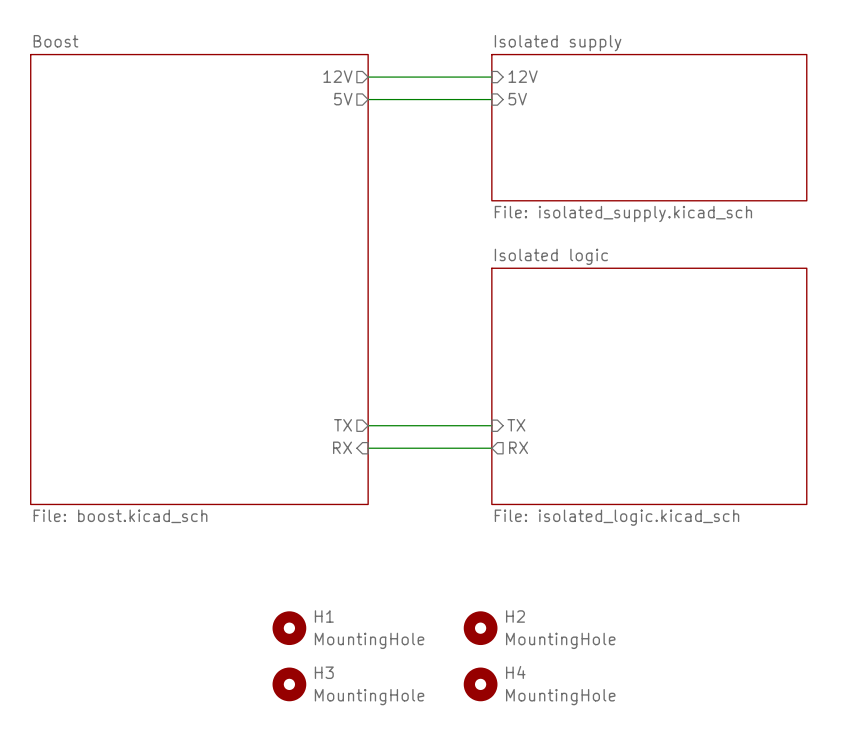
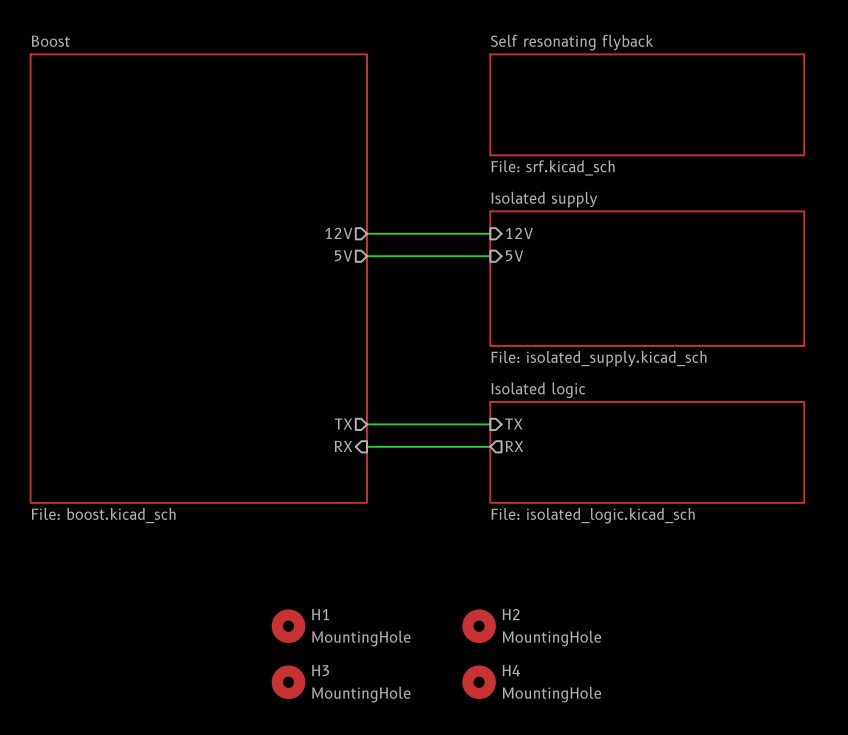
sheet pin: 12V (337, 76) -> none
sheet pin: 12V (523, 76) -> none
wire: (368, 77) (491, 77) -> (366, 233) (490, 233)
sheet pin: 5V (343, 99) -> none
wire: (368, 99) (491, 99) -> (366, 256) (490, 256)
sheet pin: 5V (517, 99) -> none
sheet Self resonating flyback: none -> File: srf.kicad_sch (647, 104)
sheet Isolated supply: File: isolated_supply.kicad_sch (649, 127) -> none
sheet pin: none -> 12V (338, 233)
sheet pin: none -> 12V (519, 233)
sheet pin: none -> 5V (343, 255)
sheet pin: none -> 5V (514, 255)
sheet Isolated supply: none -> File: isolated_supply.kicad_sch (647, 278)
sheet Isolated logic: File: isolated_logic.kicad_sch (649, 386) -> none
sheet Isolated logic: none -> File: isolated_logic.kicad_sch (647, 452)

